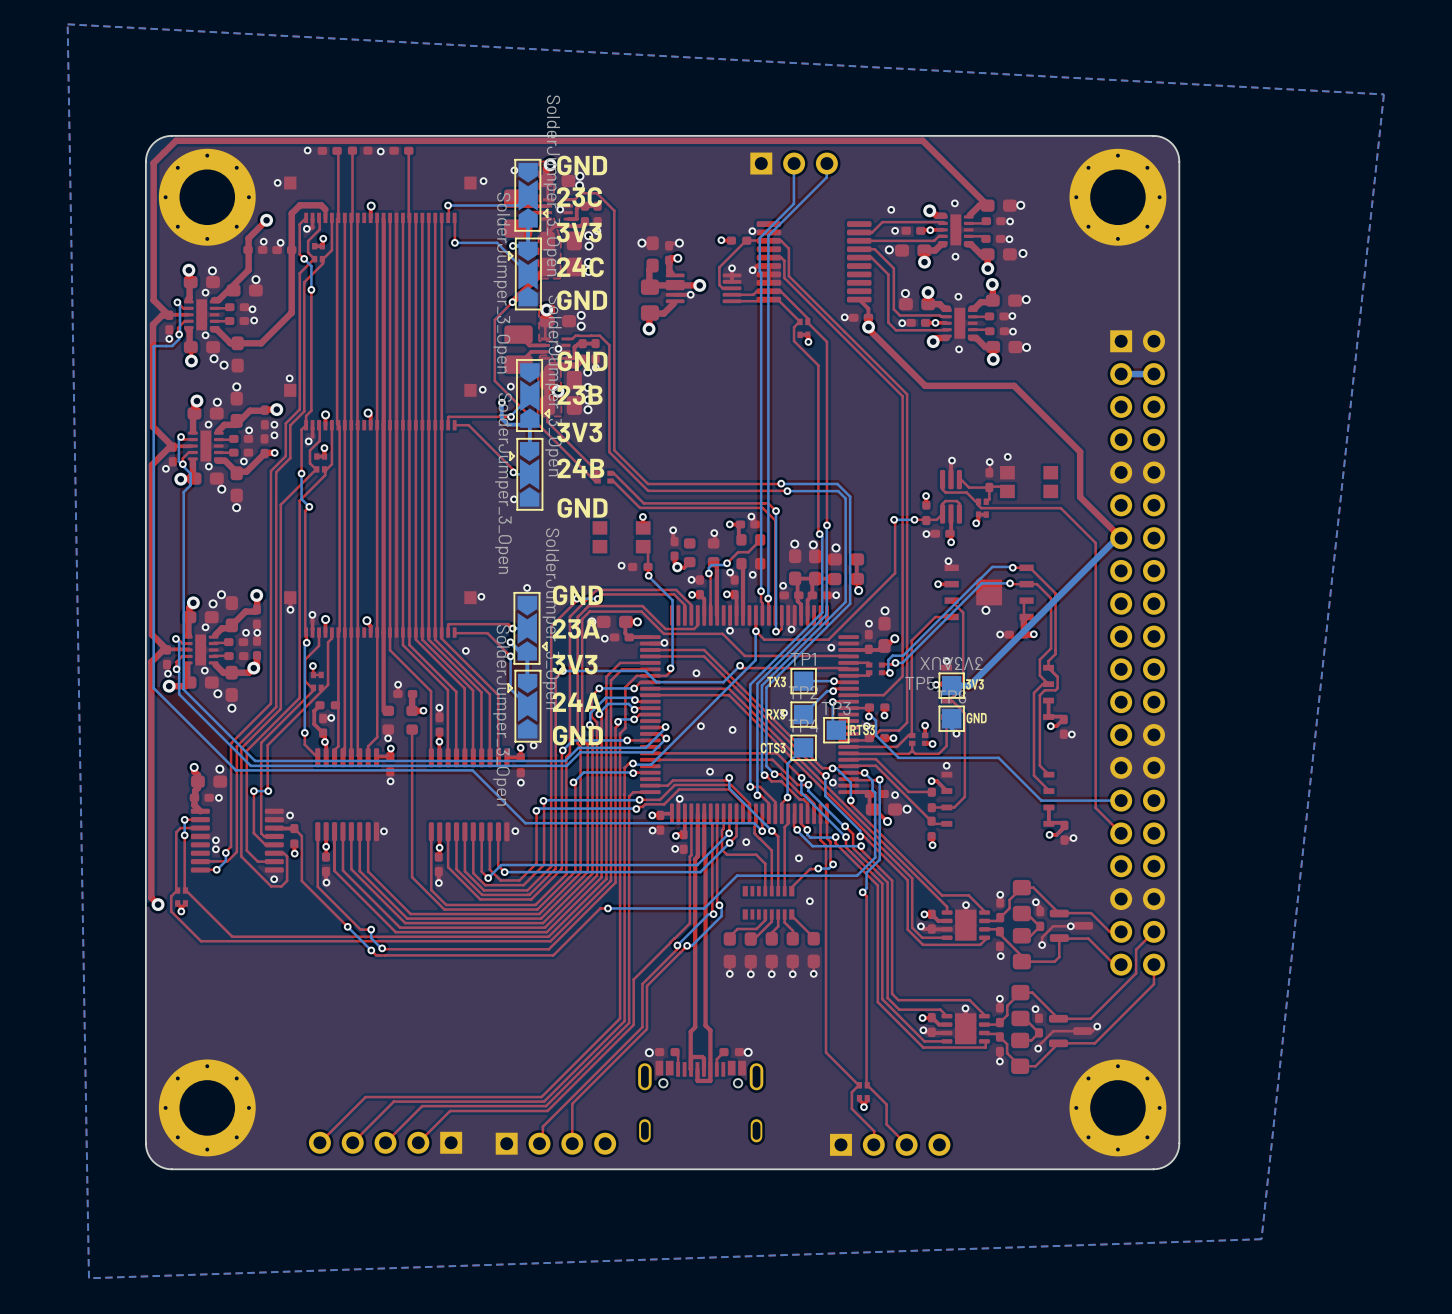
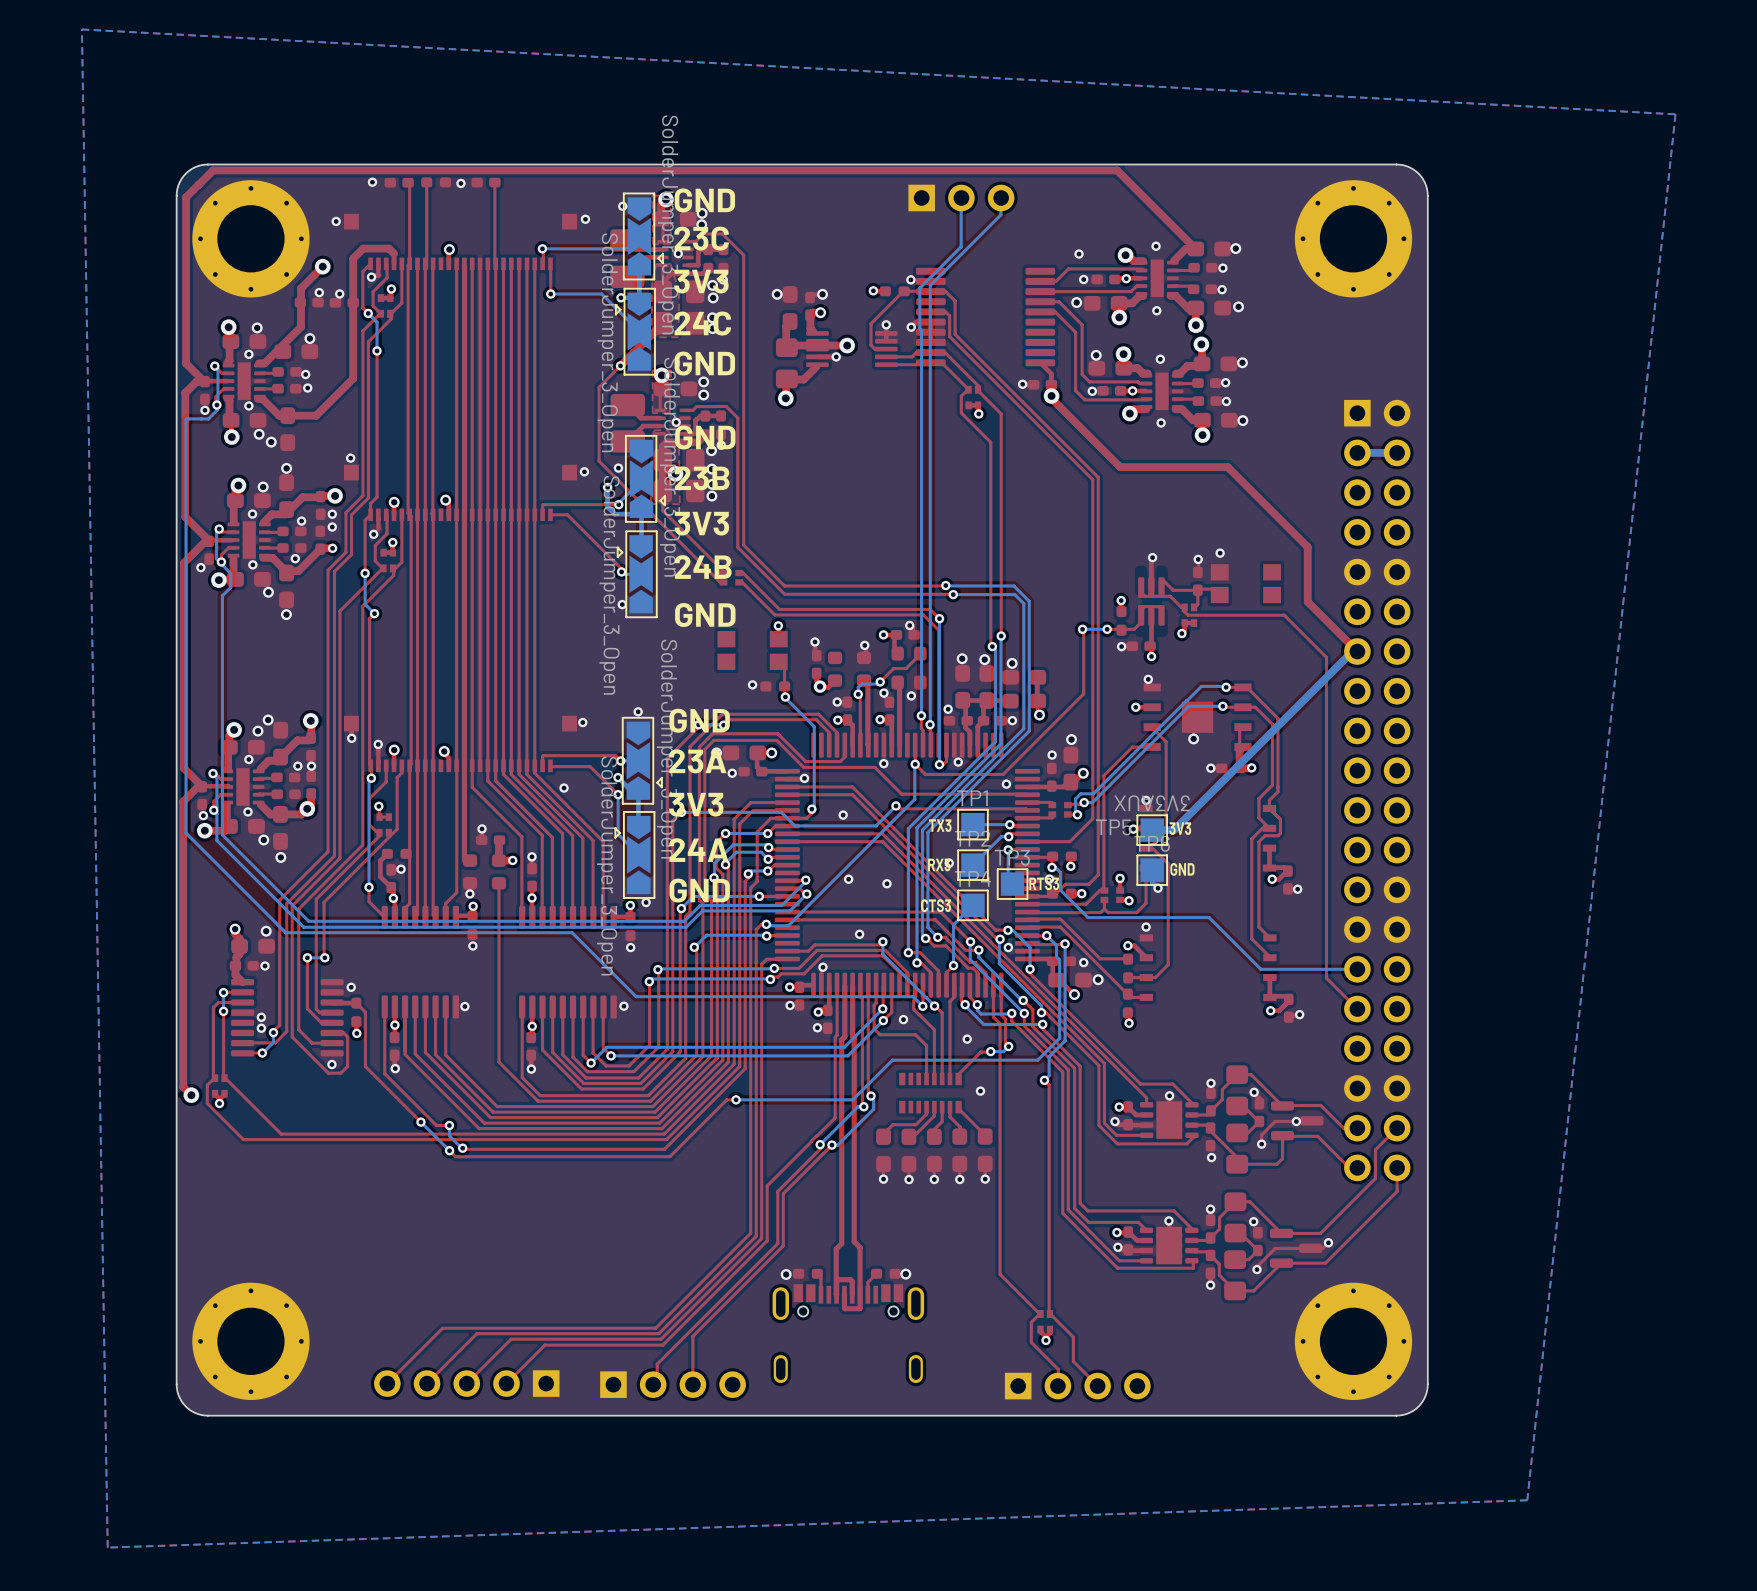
part footprint: [940, 469, 962, 524] -> [1138, 577, 1165, 626]

